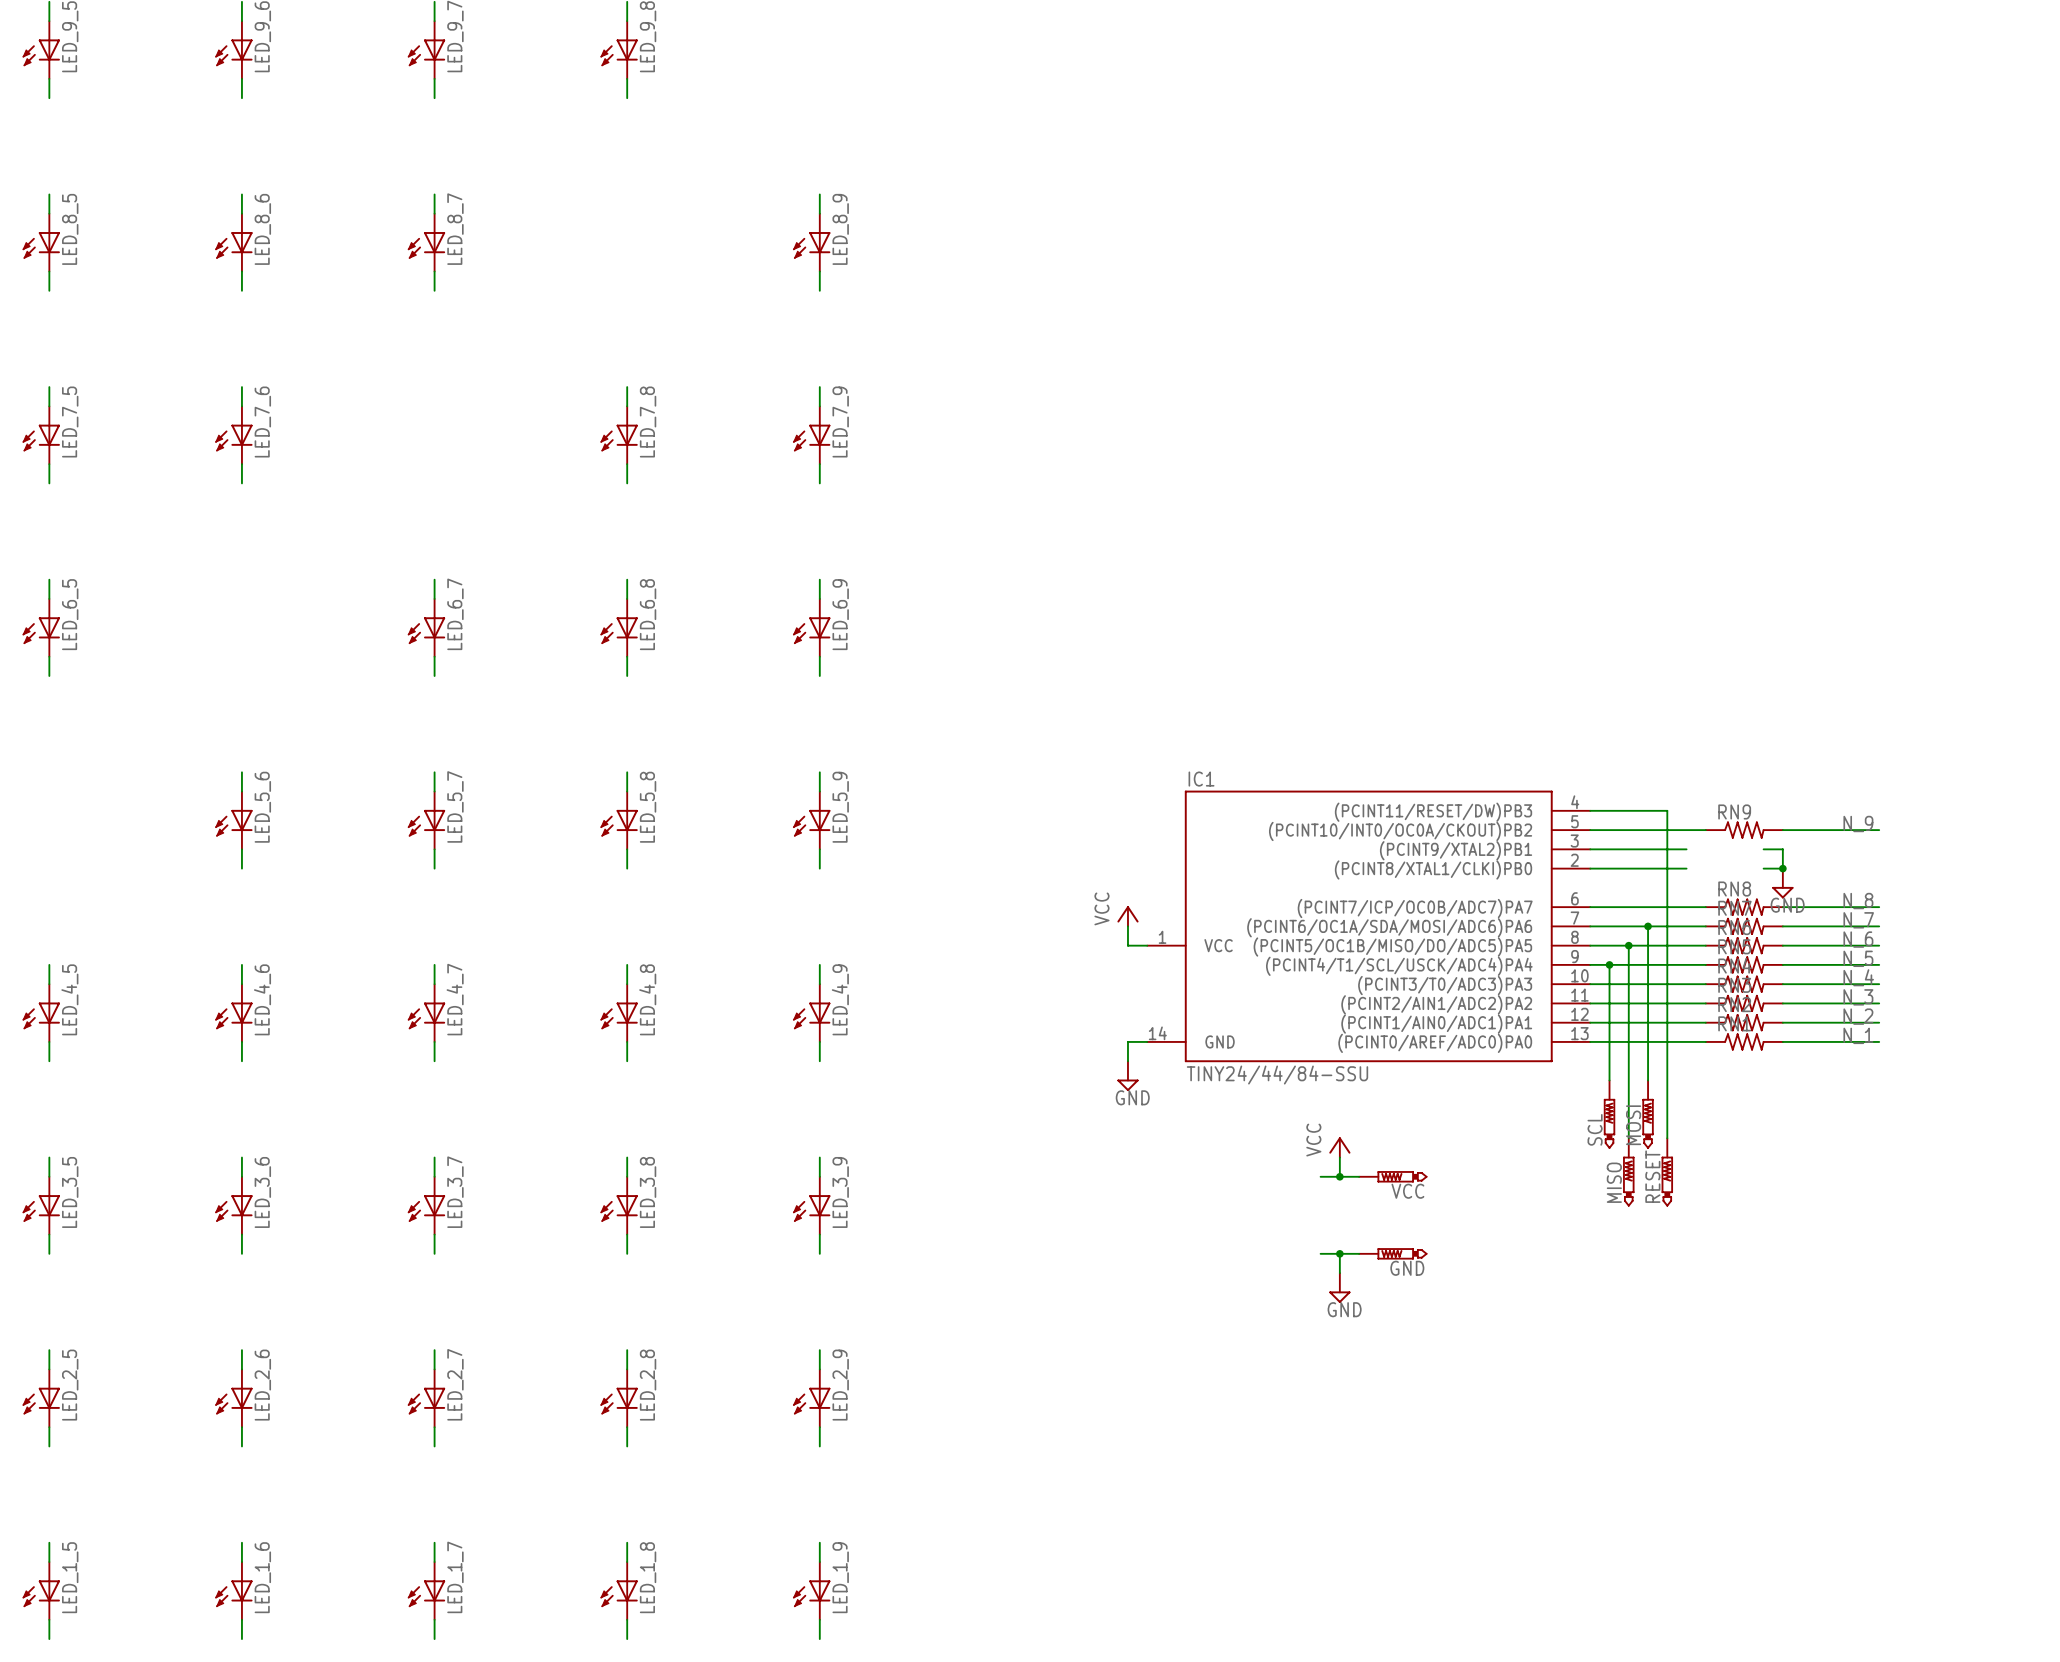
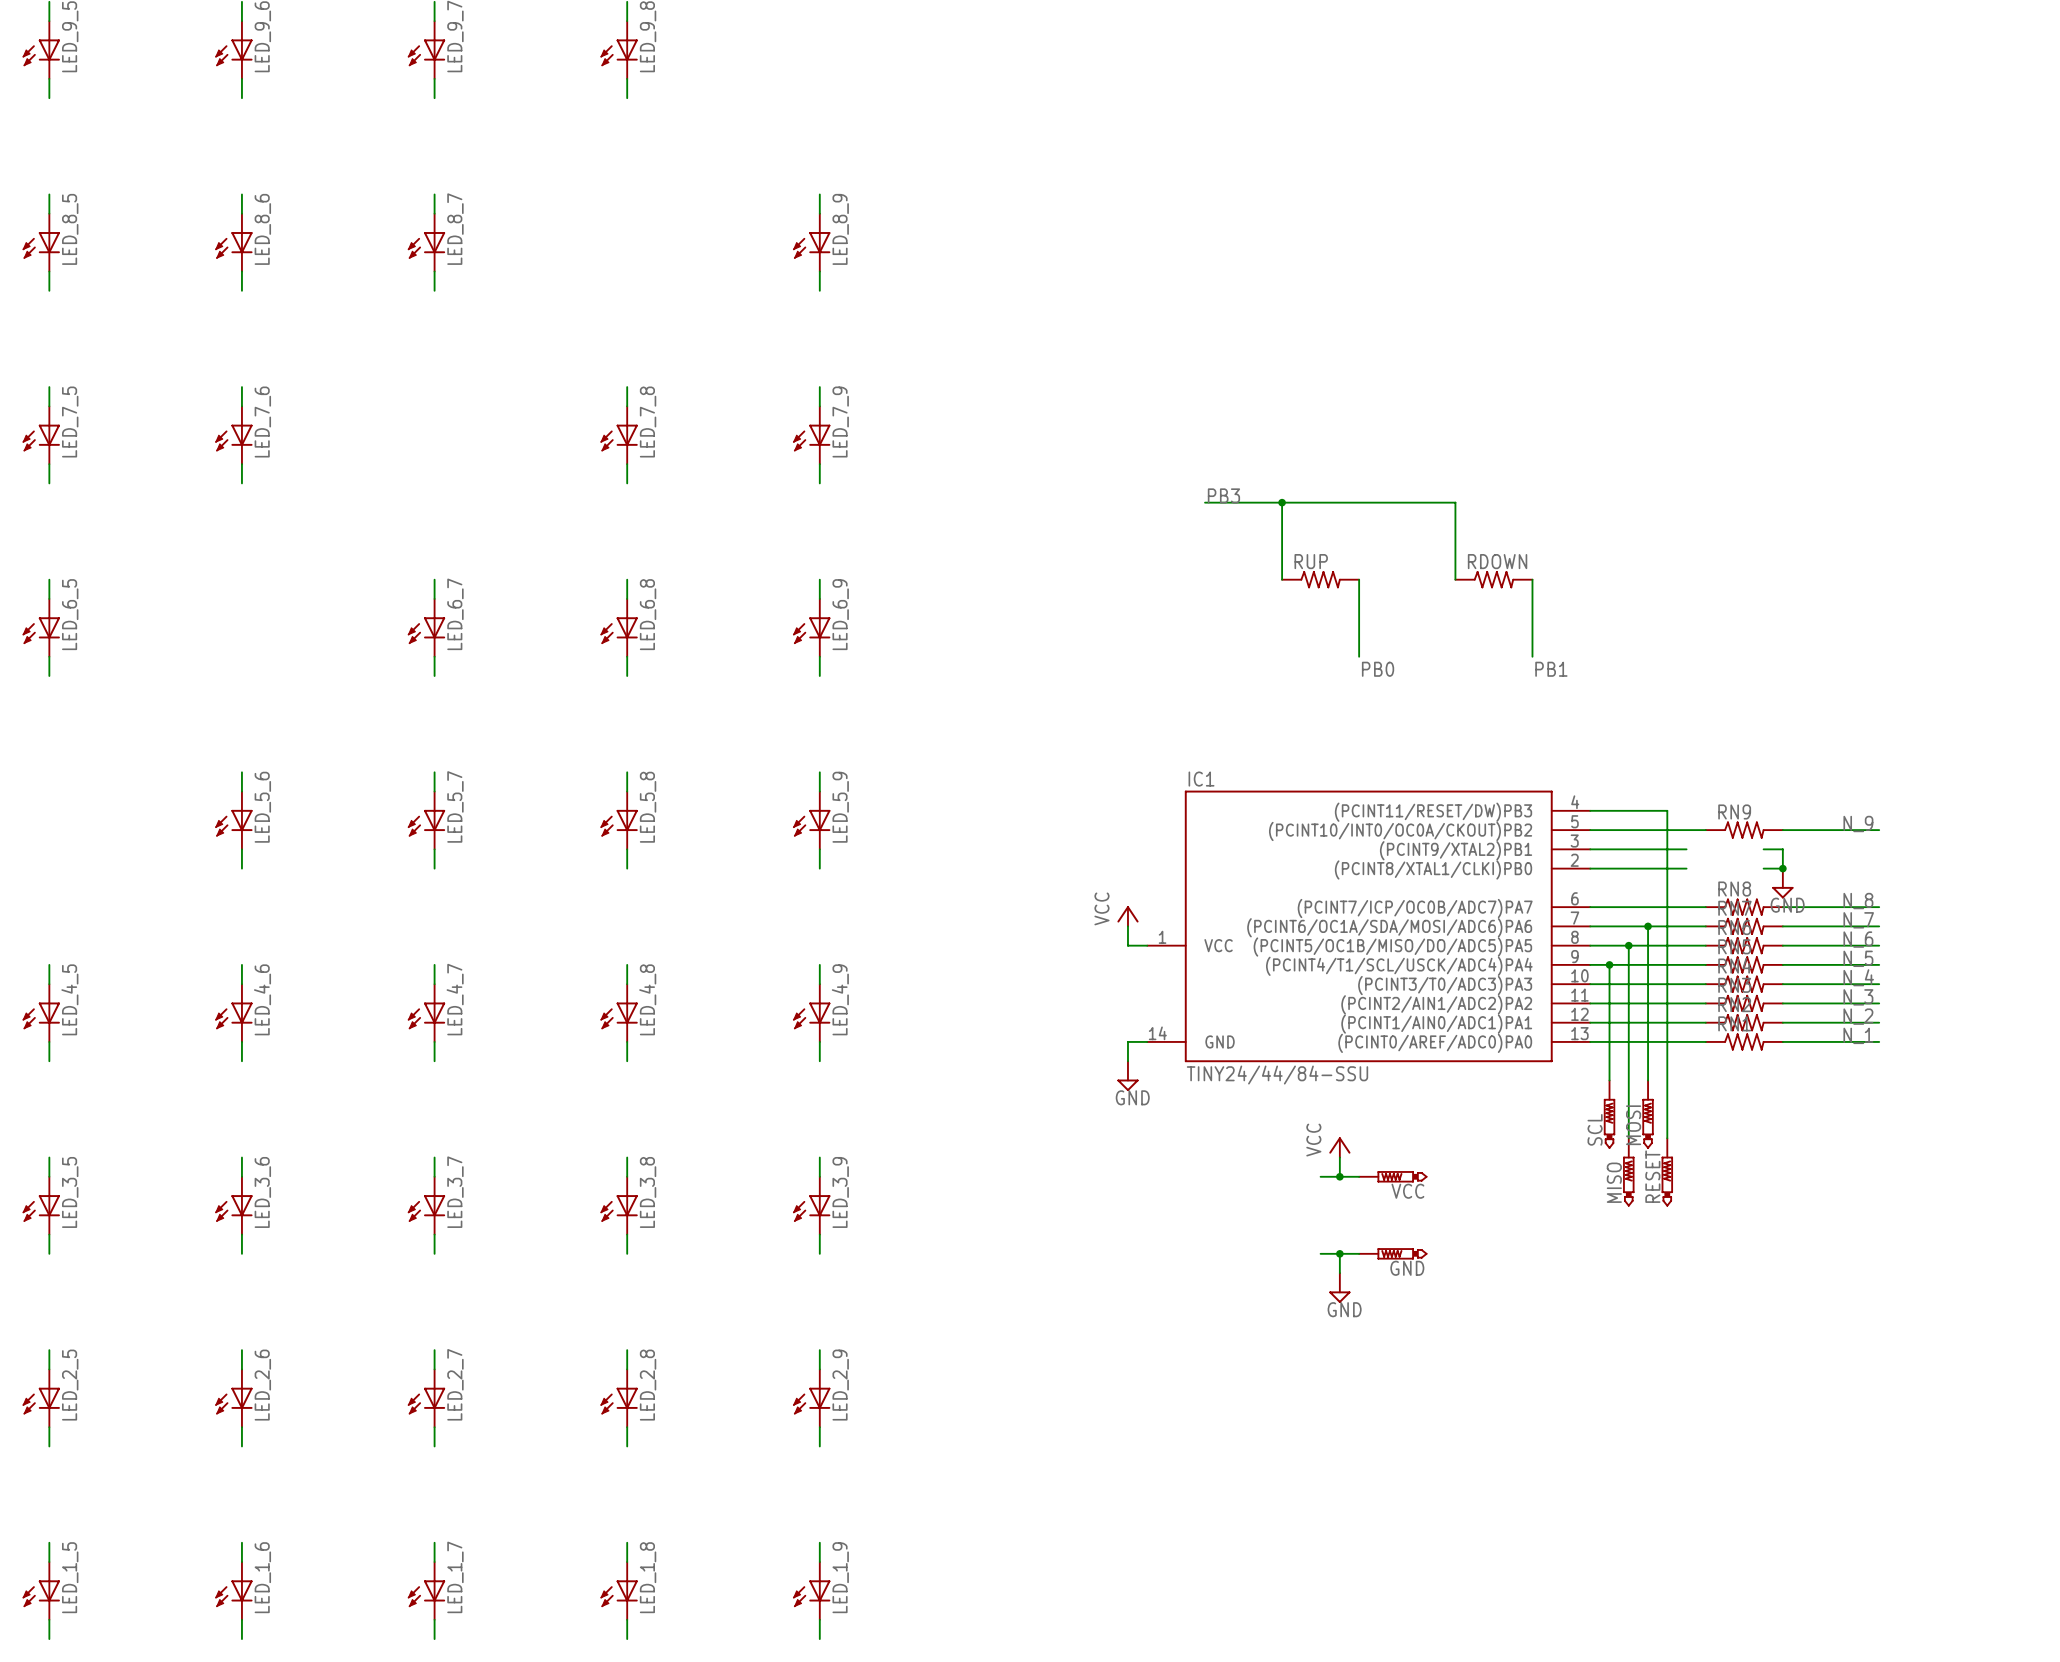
label: none -> PB3 (1223, 495)
wire: none -> (1205, 502) (1455, 502) (1455, 579)
wire: none -> (1282, 502) (1282, 579)
junction: none -> (1282, 502)
RUP: none -> (1320, 579)
wire: none -> (1359, 579) (1359, 656)
RDOWN: none -> (1493, 579)
wire: none -> (1532, 579) (1532, 656)
label: none -> PB0 (1378, 669)
label: none -> PB1 (1551, 669)

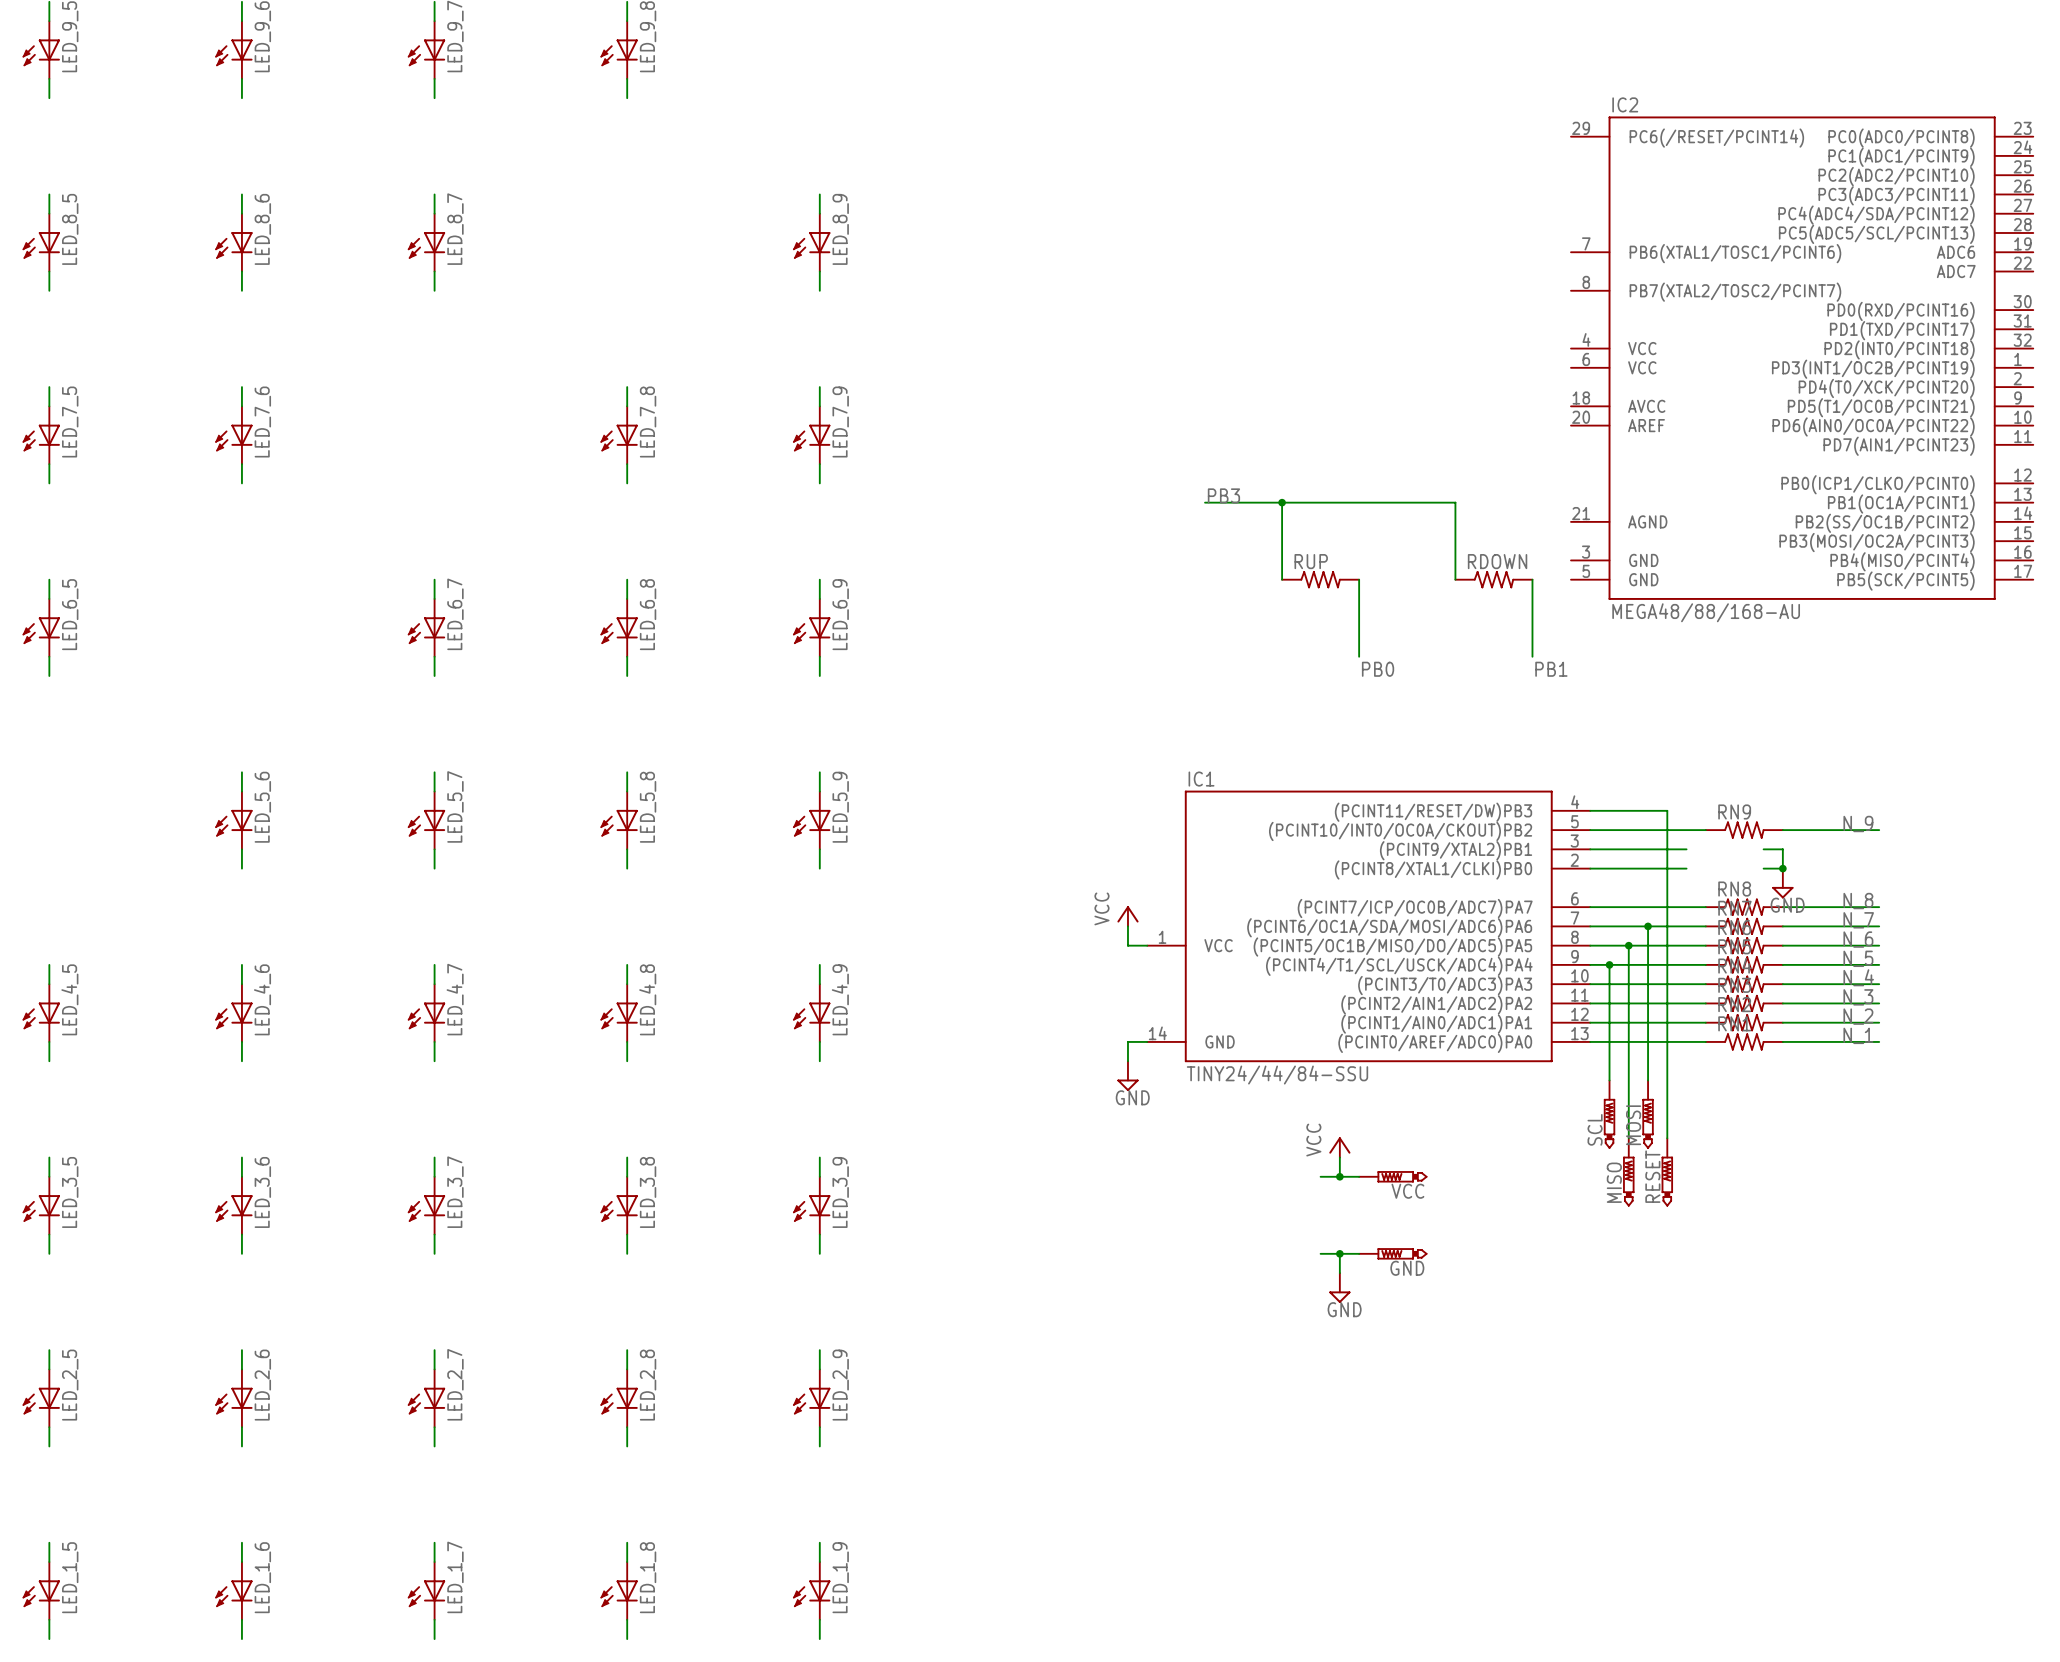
IC2: none -> MEGA48/88/168-AU (1802, 358)

